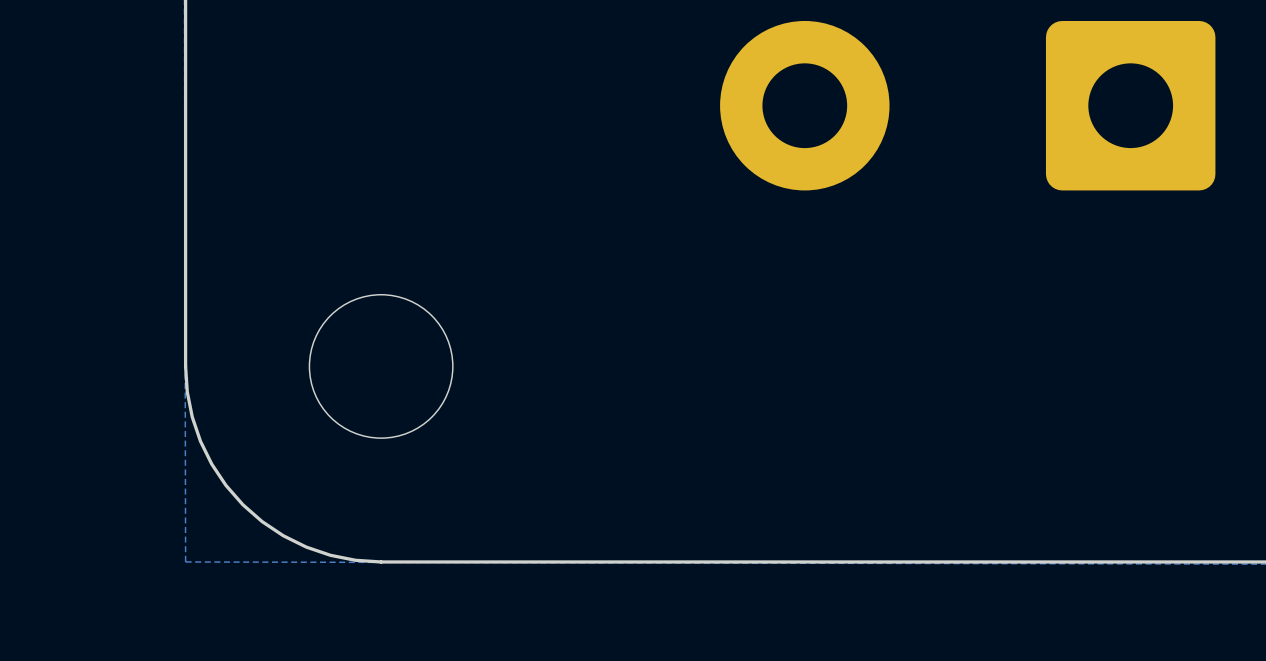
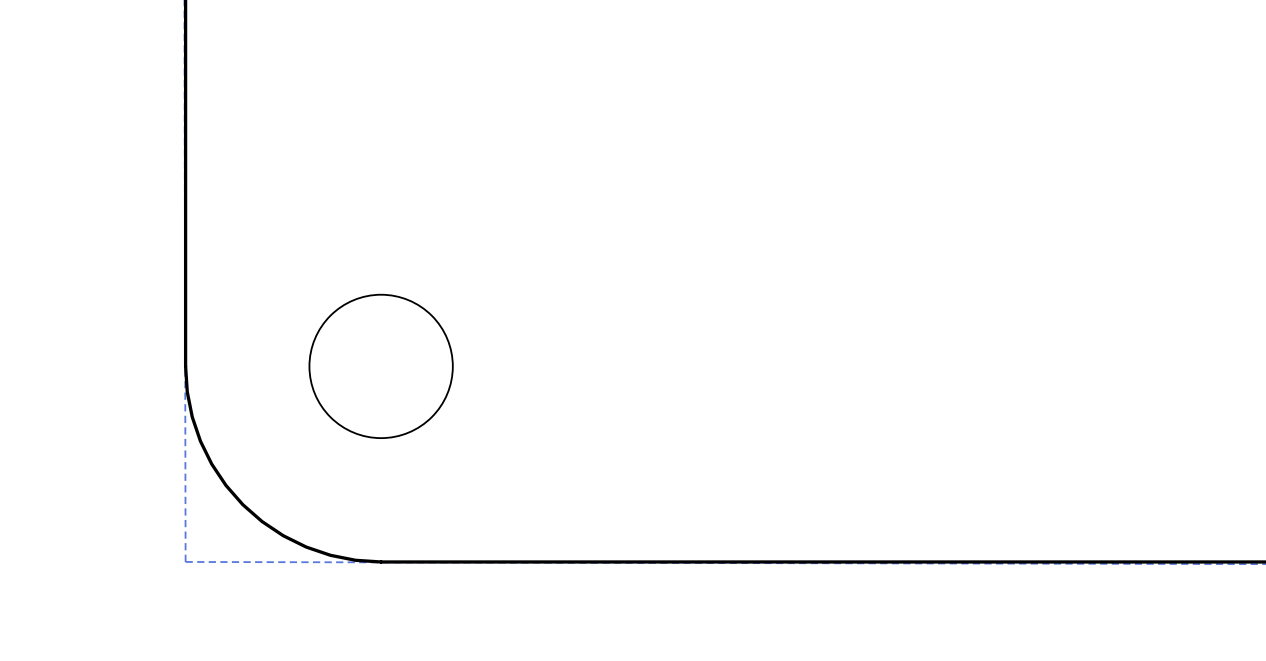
part: (967, 105) -> none

